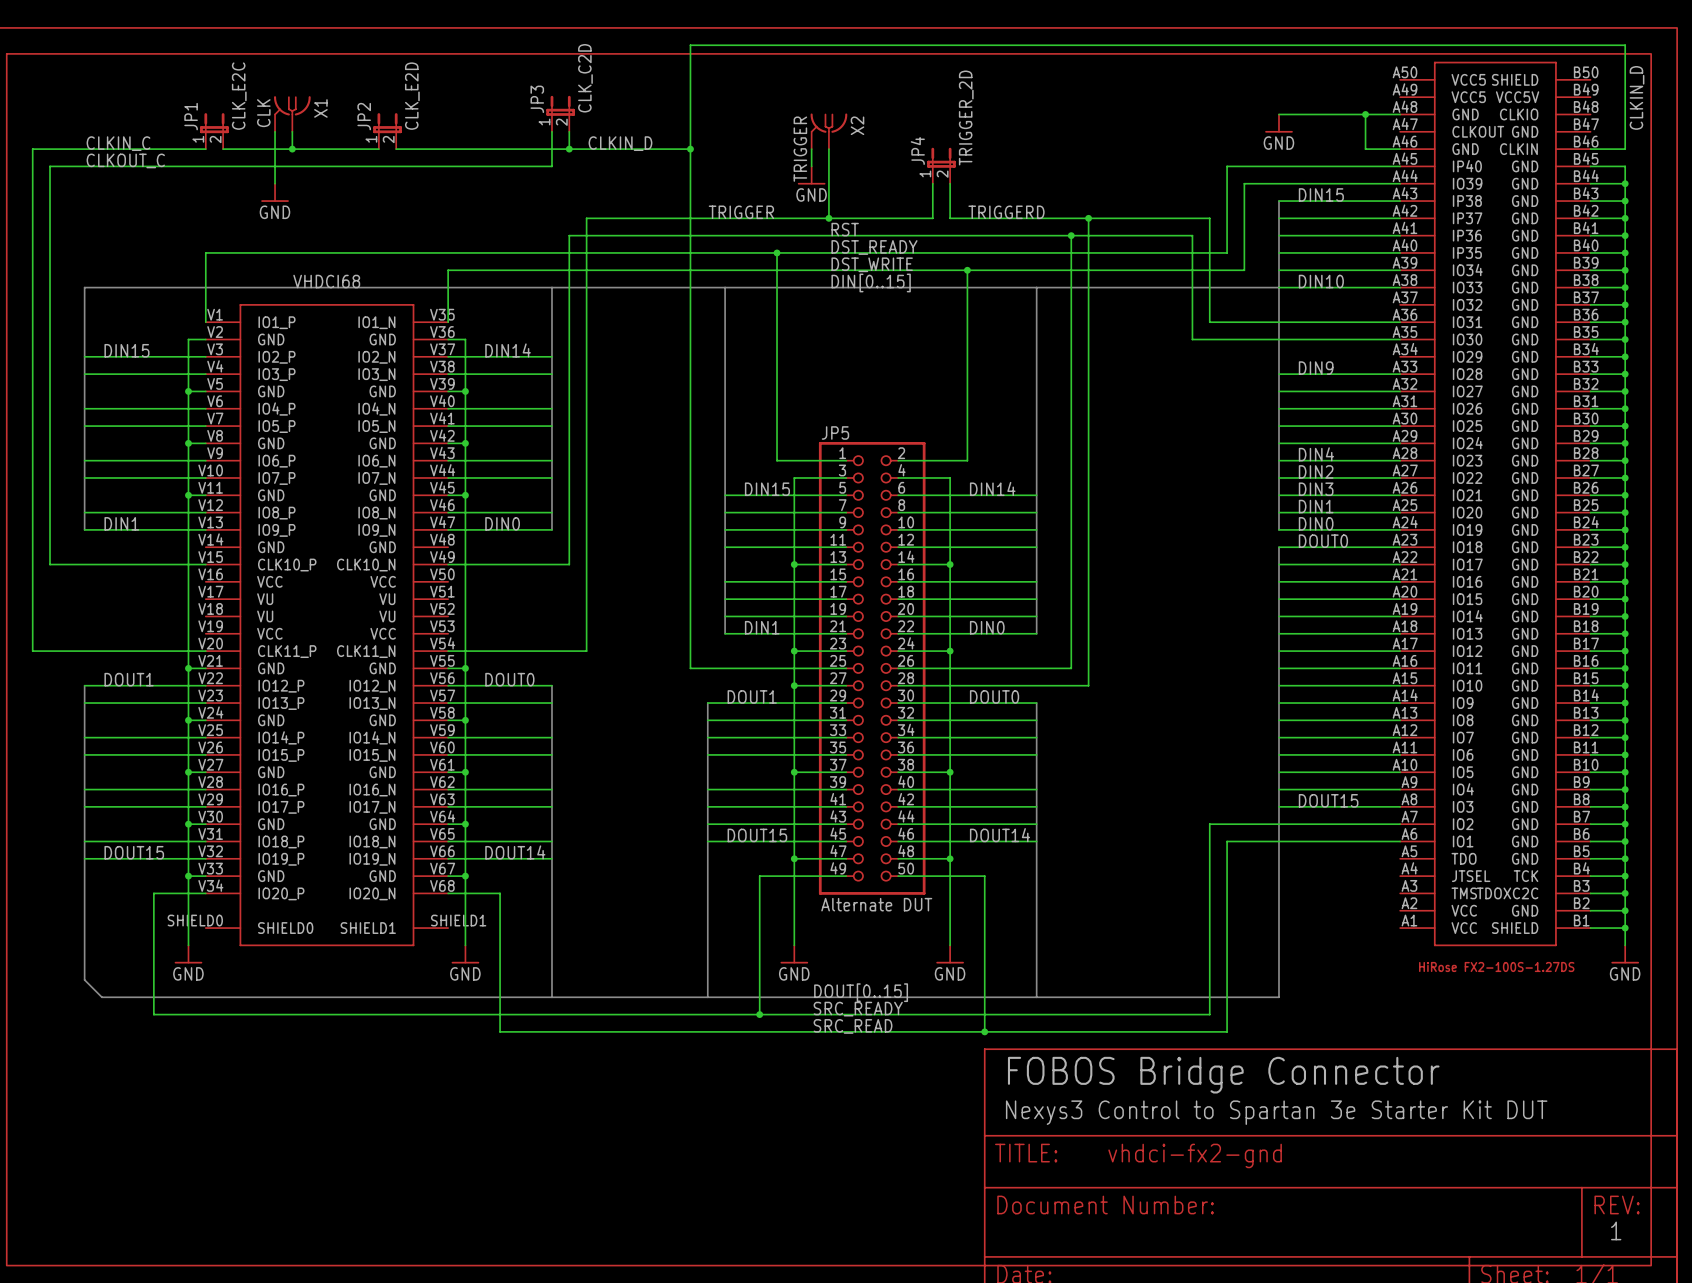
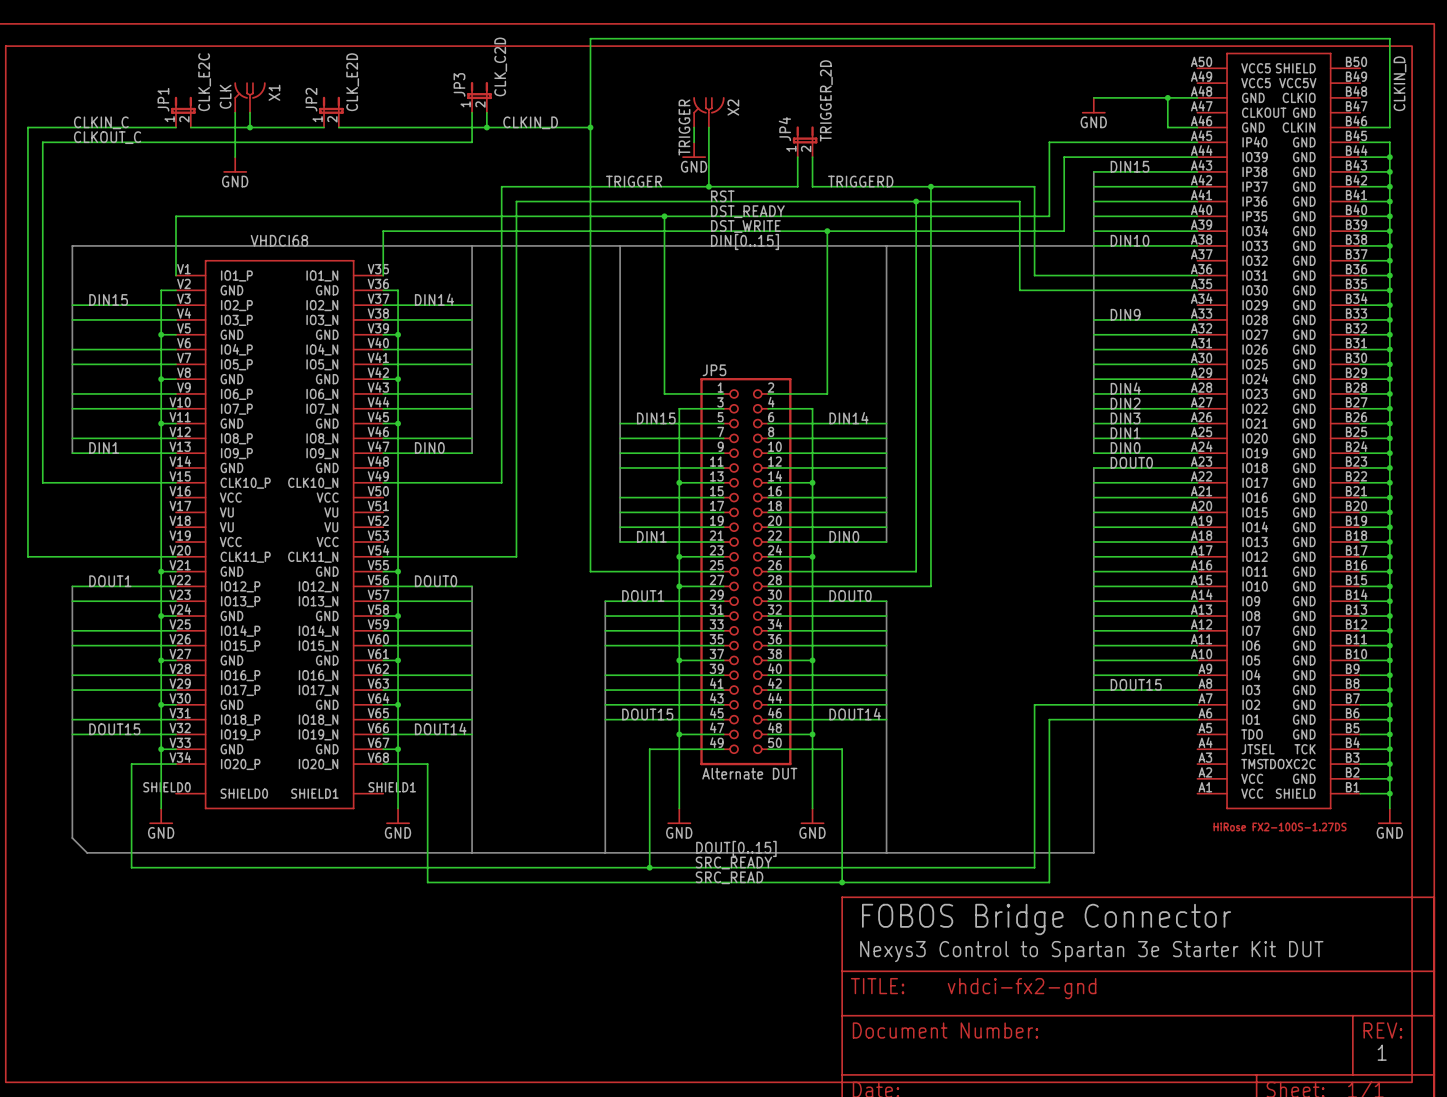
wire: (603, 235) (569, 235) (569, 564) -> (516, 201) (516, 556) (501, 556)
wire: (586, 564) (586, 651) -> (501, 482) (486, 482)

